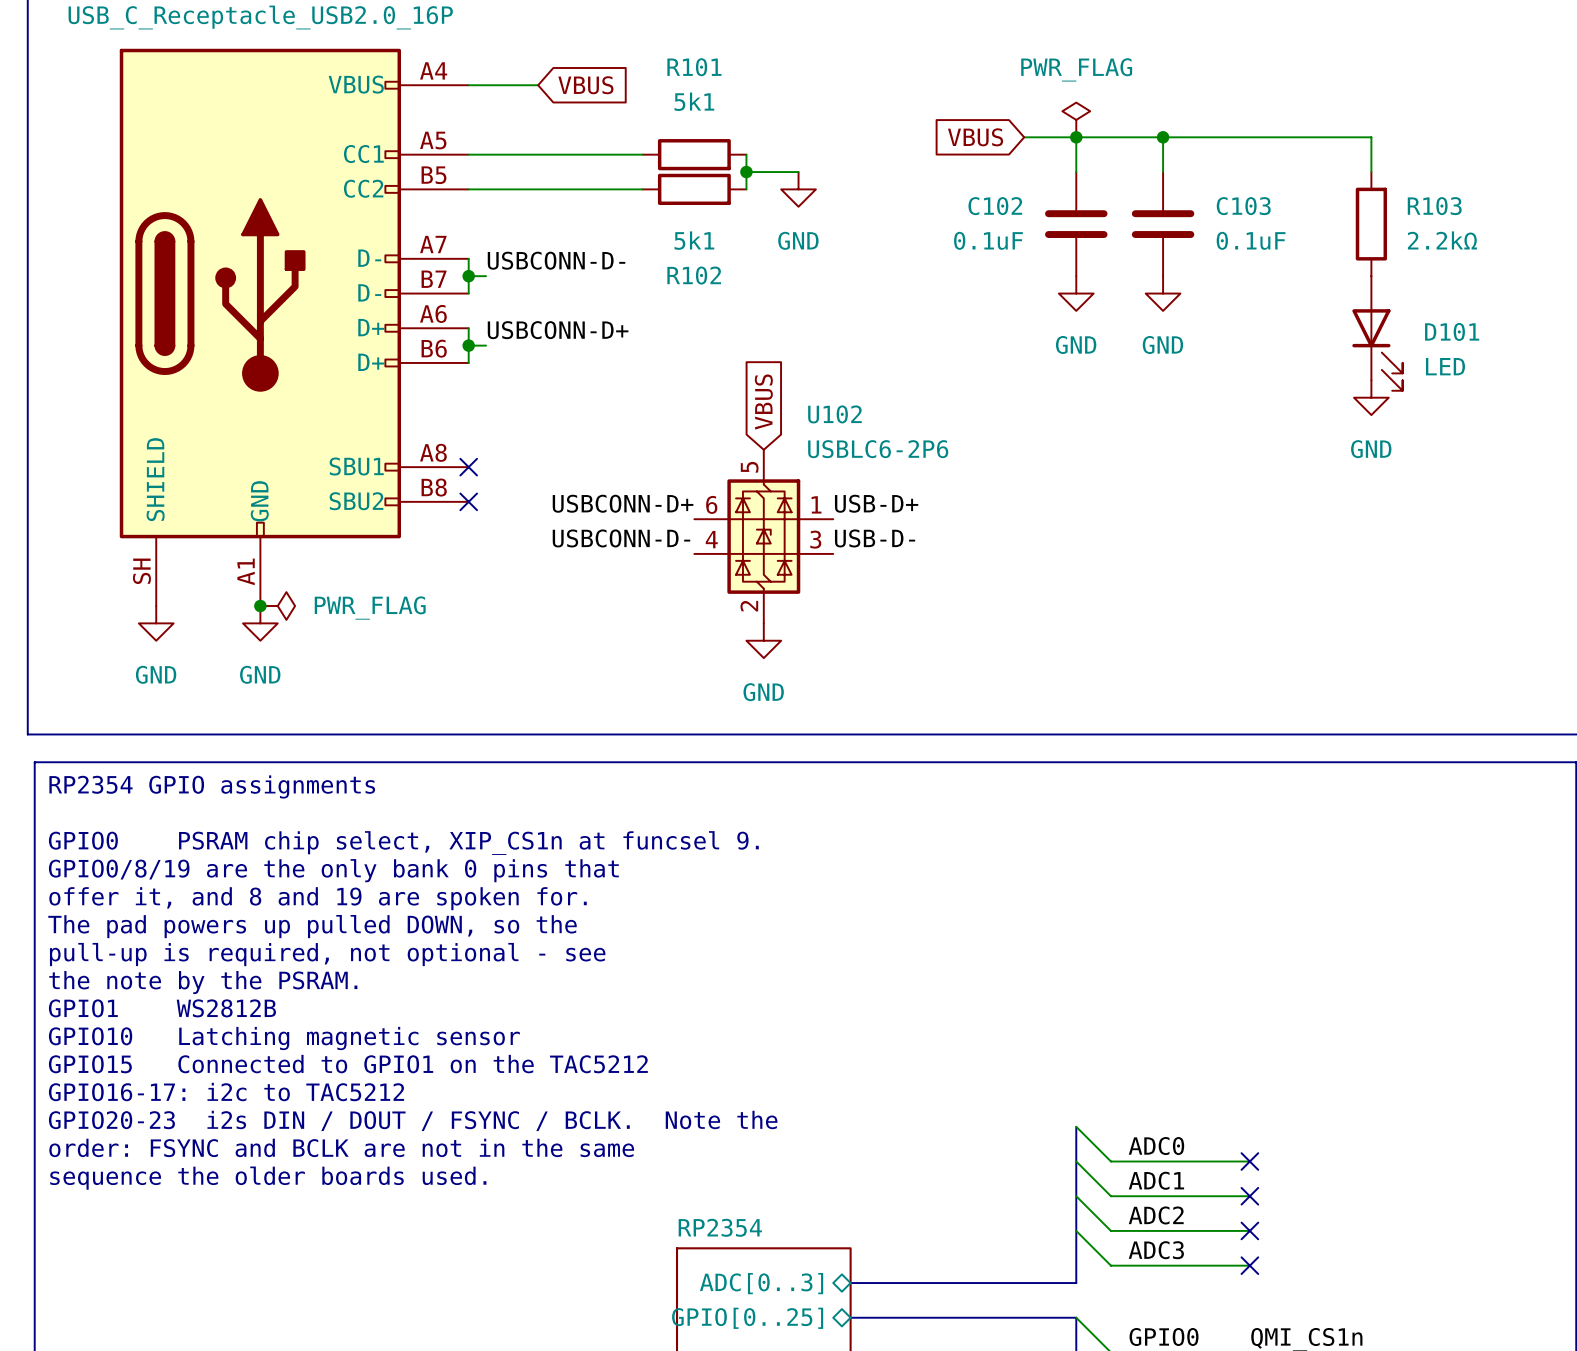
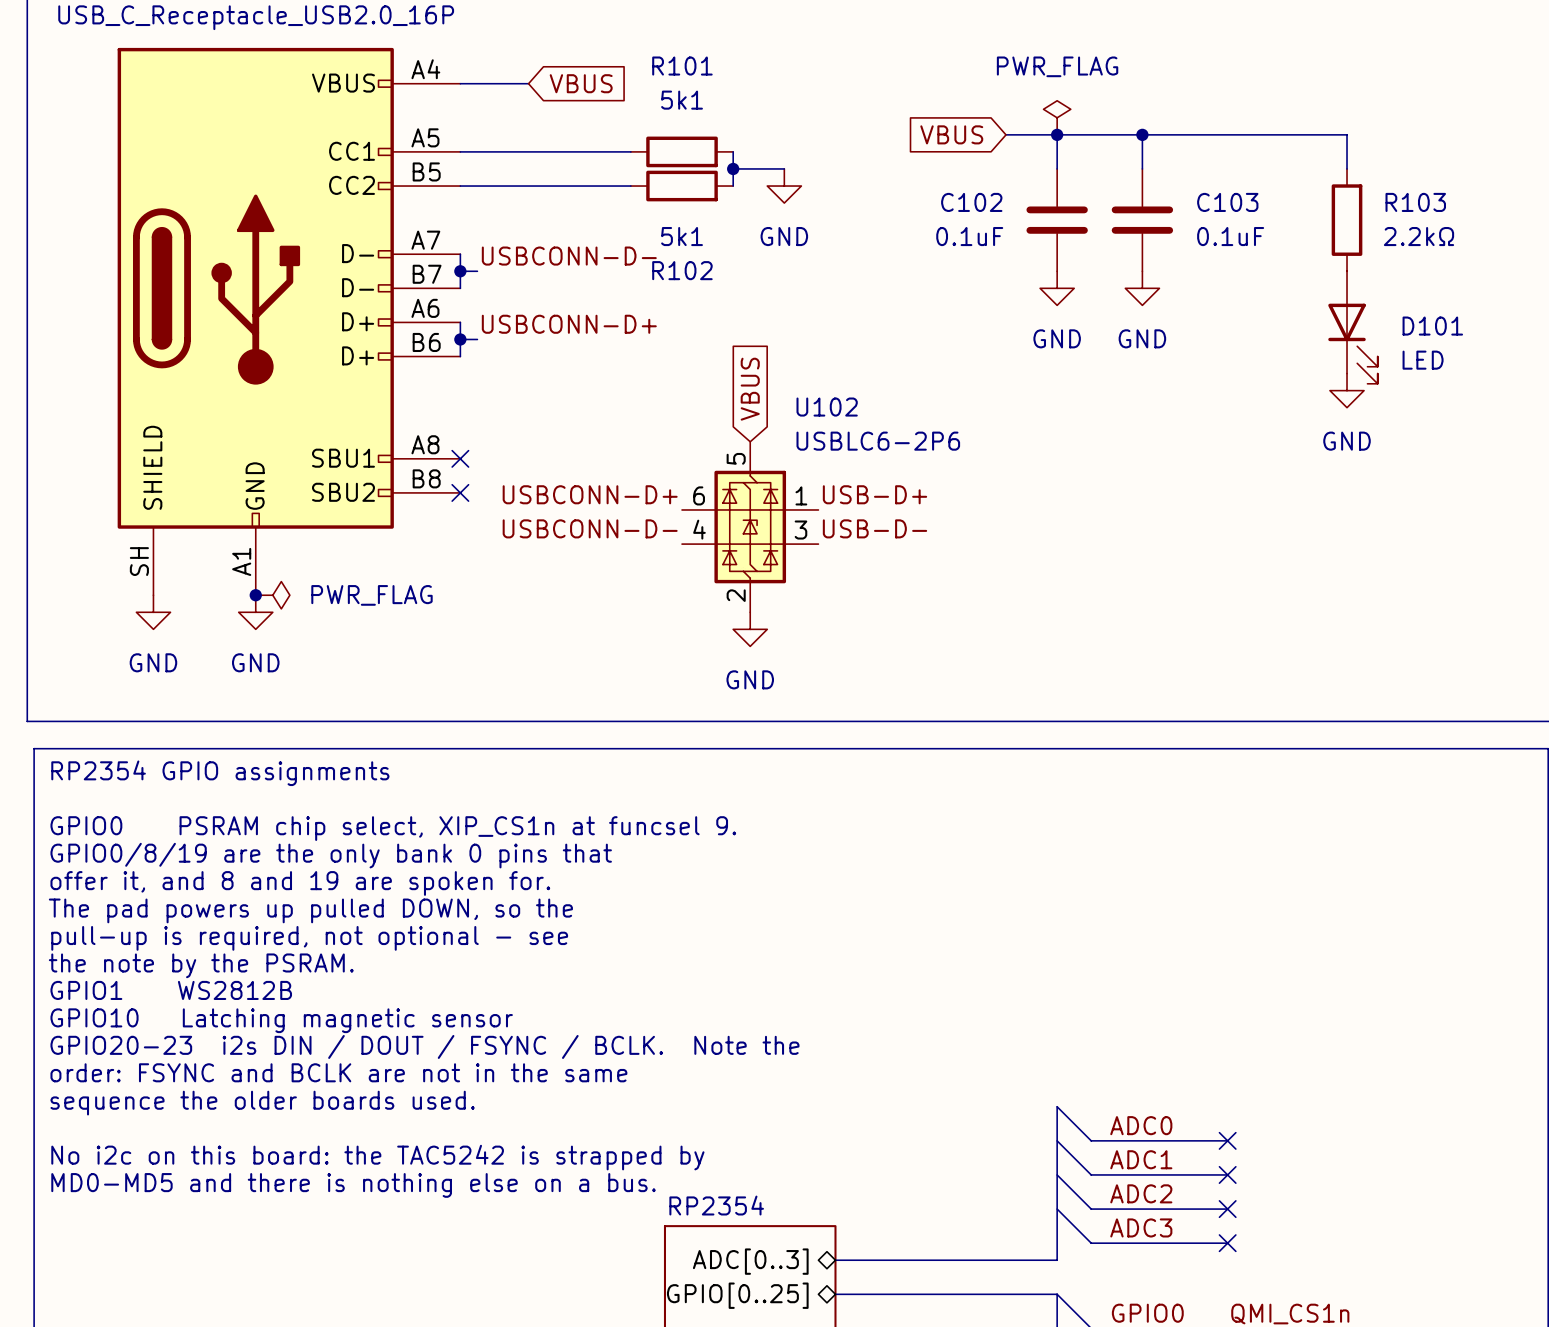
text: GPIO15 Connected to GPIO1 on the TAC5212 (348, 1064) -> GPIO20-23 i2s DIN / DOUT / FSYNC / BCLK. Note the (424, 1046)
text: GPIO16-17: i2c to TAC5212 (226, 1092) -> order: FSYNC and BCLK are not in the same (338, 1072)
text: GPIO20-23 i2s DIN / DOUT / FSYNC / BCLK. Note the (413, 1120) -> sequence the older boards used. (262, 1103)
text: order: FSYNC and BCLK are not in the same (341, 1147) -> none
text: sequence the older boards used. (268, 1178) -> No i2c on this board: the TAC5242 is strapped by (377, 1157)
text: none -> MD0-MD5 and there is nothing else on a bus. (353, 1185)

